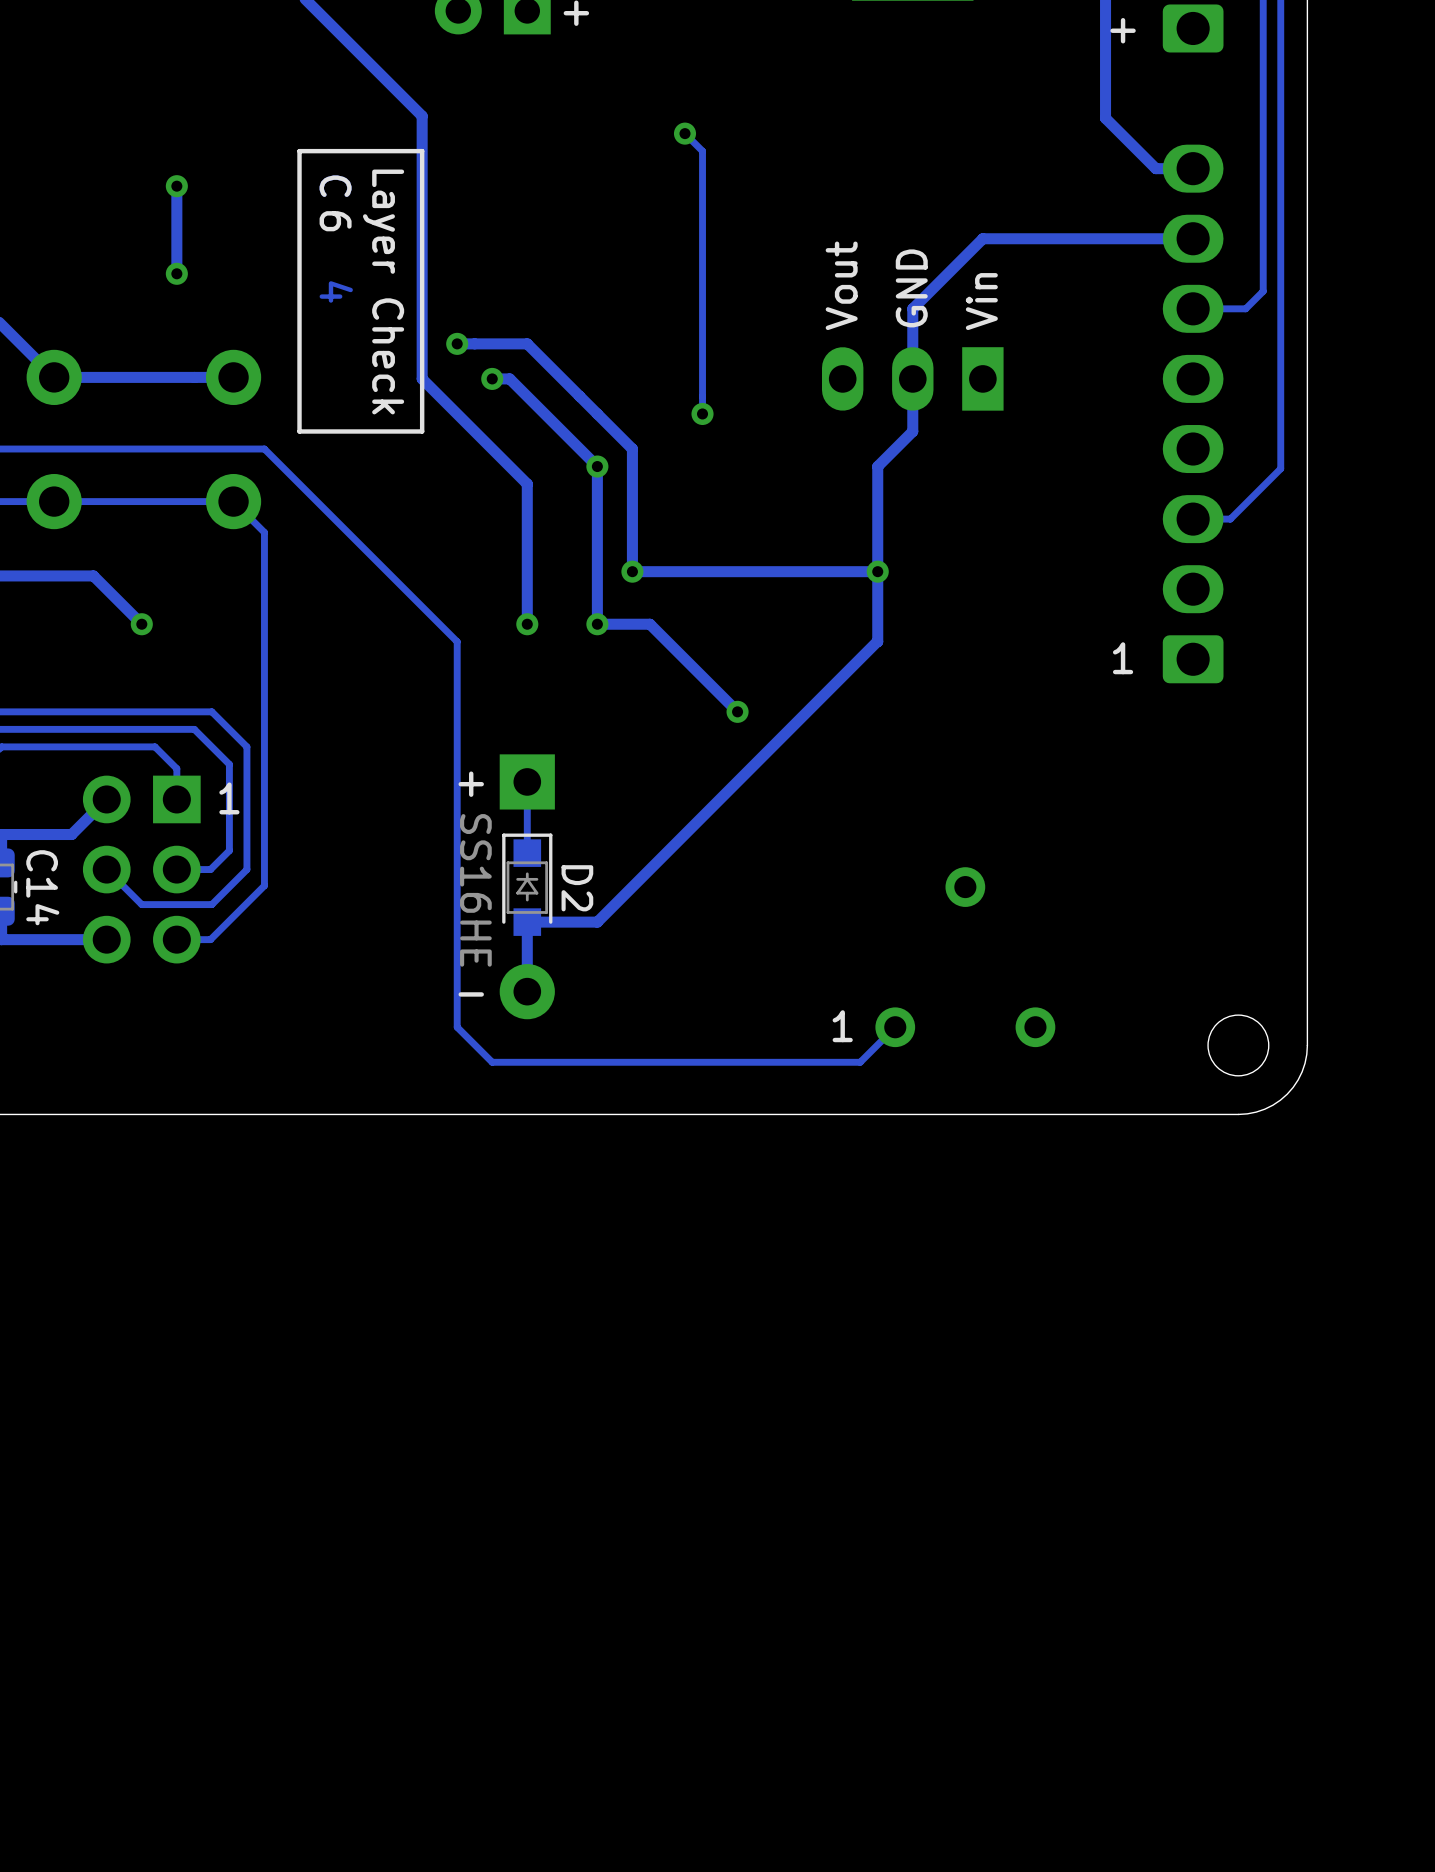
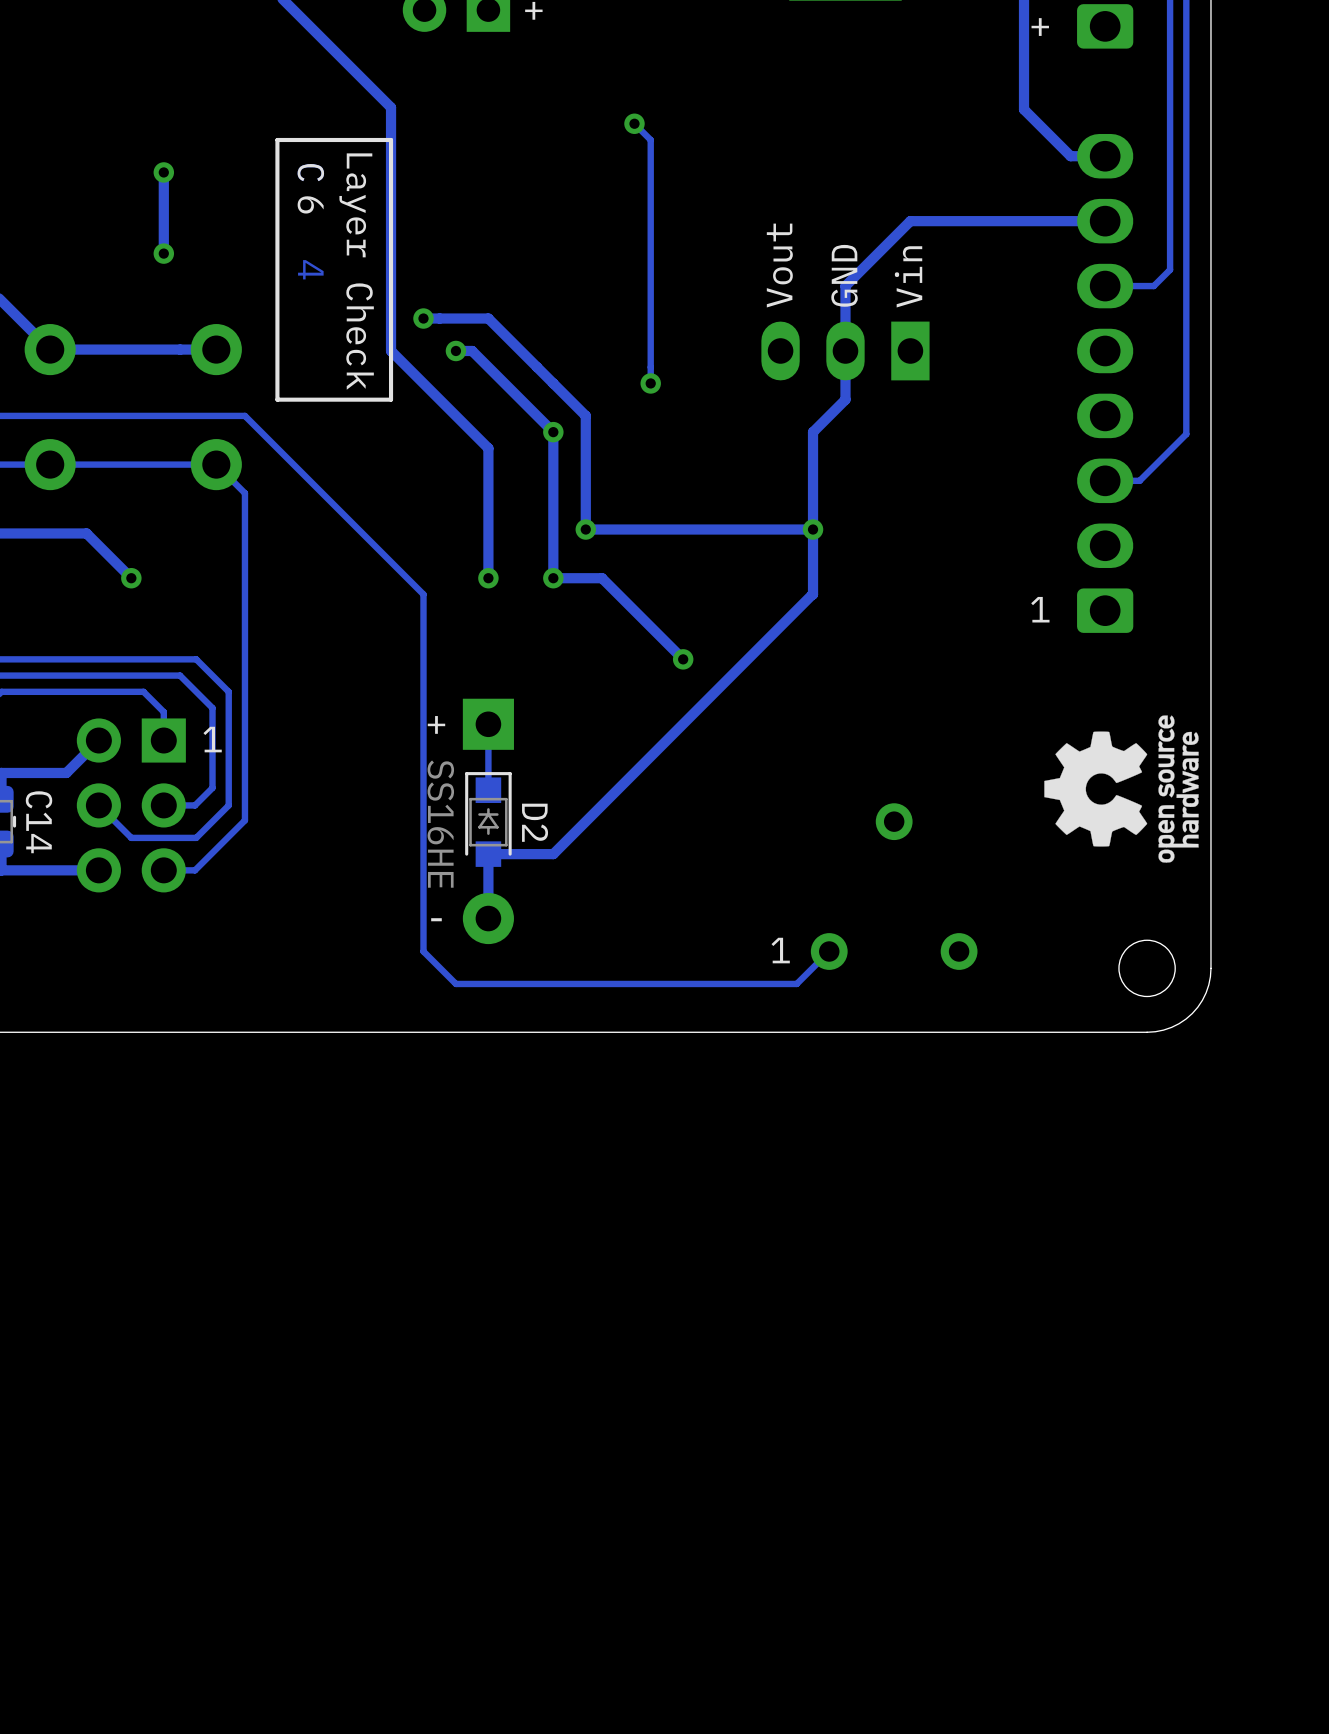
drawing: none -> [1044, 715, 1199, 863]

